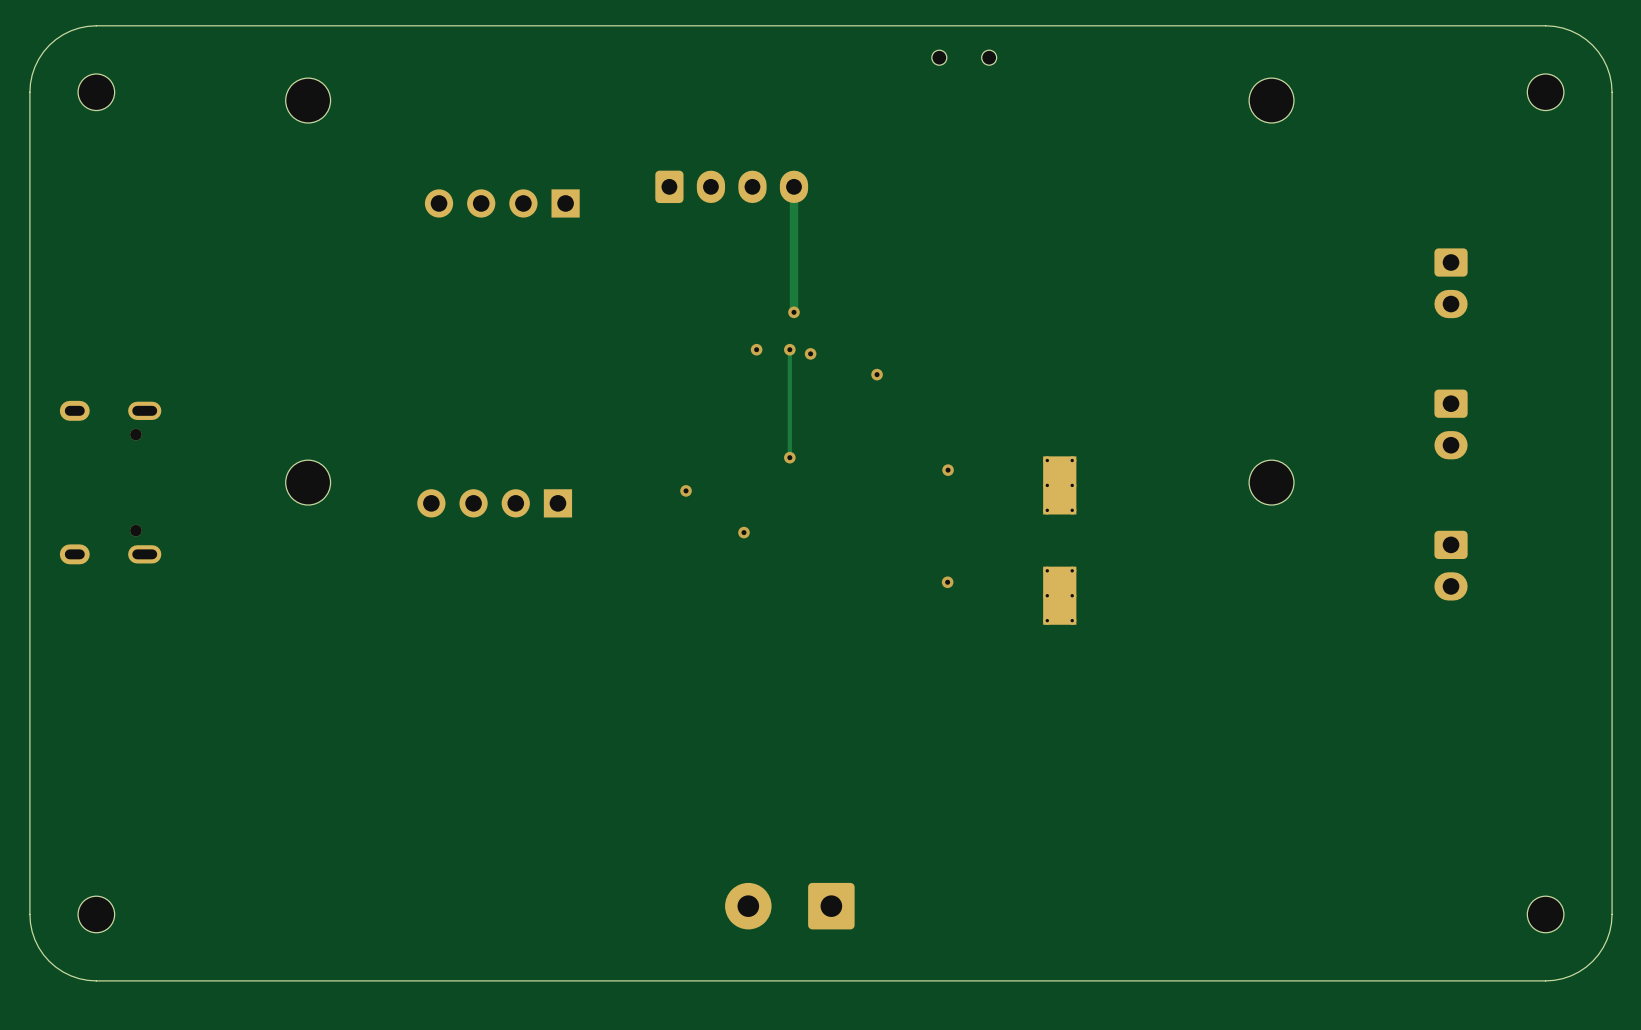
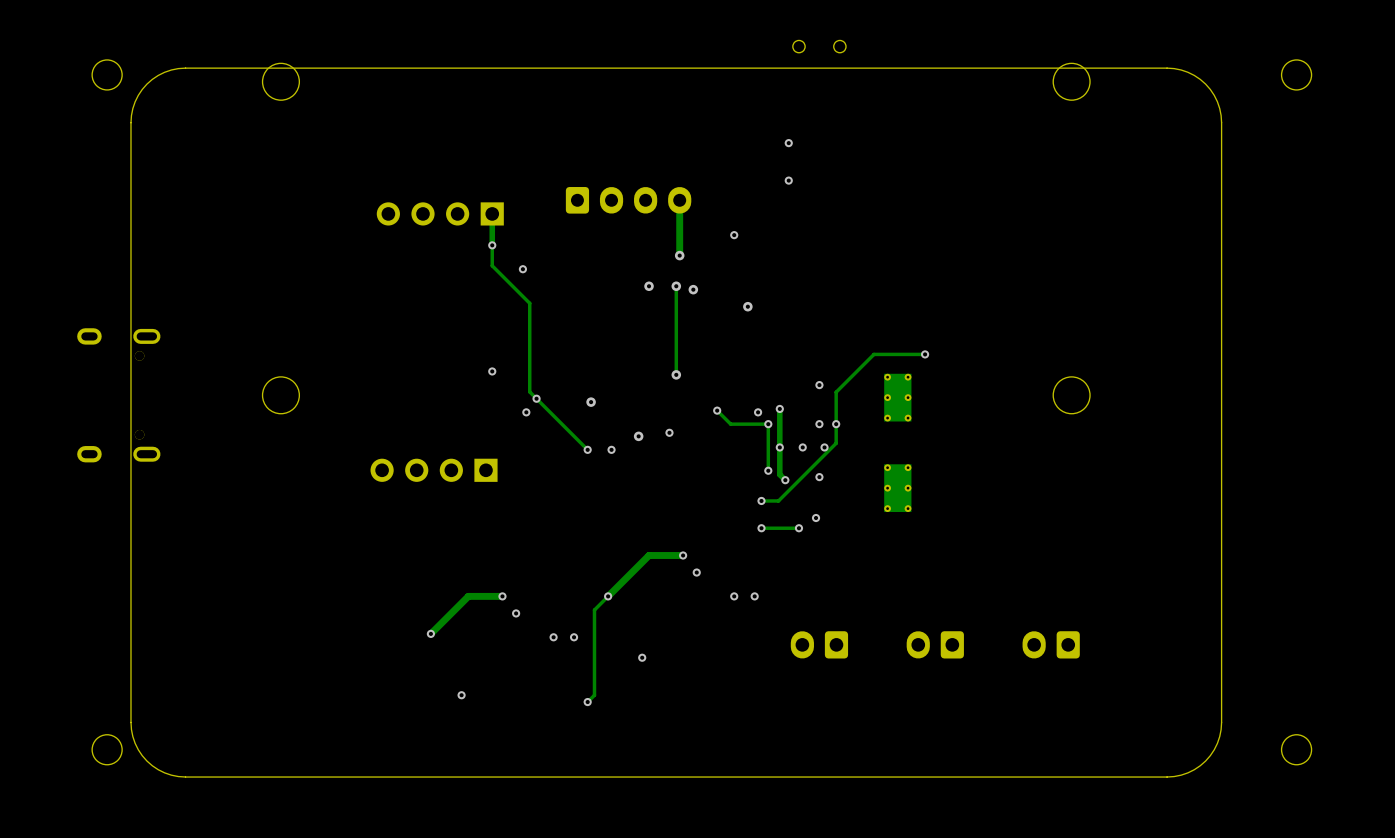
board edge: (1545, 25) (96, 25) (79, 28) (63, 34) (49, 45) (38, 59) (32, 75) (29, 92) (29, 914) (32, 931) (38, 947) (49, 961) (63, 972) (79, 978) (96, 980) (1545, 980) (1562, 978) (1578, 972) (1592, 961) (1603, 947) (1609, 931) (1612, 914) (1612, 92) (1607, 66) (1592, 45) (1571, 30) (1545, 25) -> (1167, 68) (1187, 72) (1205, 84) (1217, 101) (1221, 122) (1221, 722) (1219, 736) (1214, 749) (1205, 761) (1194, 769) (1181, 775) (1167, 777) (185, 777) (171, 775) (158, 769) (146, 761) (138, 749) (132, 736) (130, 722) (130, 122) (132, 108) (138, 95) (146, 84) (158, 75) (171, 69) (185, 68) (1167, 68)
via: none -> (788, 143)
part position: (731, 186) -> (628, 200)
track: (793, 186) (793, 244) -> none
part position: (502, 203) -> (440, 213)
via: none -> (788, 180)
track: none -> (492, 213) (492, 265) (529, 303) (529, 391) (587, 449)
part: (1451, 283) -> none
via: none -> (734, 235)
via: none -> (492, 245)
via: none -> (522, 269)
part: (1451, 424) -> none
track: none -> (925, 354) (873, 354) (836, 392) (836, 443) (778, 500) (761, 500)
via: none -> (925, 354)
via: none -> (492, 371)
via: (948, 470) -> none
via: none -> (819, 385)
via: none -> (536, 398)
track: none -> (779, 408) (779, 474) (785, 480)
via: none -> (779, 408)
track: none -> (717, 410) (730, 424) (768, 424) (768, 470)
via: none -> (717, 410)
part position: (494, 503) -> (434, 470)
via: none -> (526, 412)
via: none -> (758, 412)
via: none -> (768, 424)
via: none -> (819, 424)
via: none -> (836, 424)
via: none -> (669, 432)
via: none -> (779, 447)
via: none -> (802, 447)
via: none -> (824, 447)
via: none -> (587, 449)
via: none -> (611, 449)
part: (1451, 565) -> none
via: none -> (768, 470)
via: (947, 582) -> none
via: none -> (819, 477)
via: none -> (785, 480)
via: none -> (761, 500)
via: none -> (816, 518)
via: none -> (761, 528)
track: none -> (798, 528) (761, 528)
via: none -> (798, 528)
track: none -> (683, 555) (649, 555) (594, 610) (594, 695) (587, 702)
via: none -> (683, 555)
via: none -> (696, 572)
track: none -> (502, 596) (468, 596) (430, 633)
via: none -> (502, 596)
via: none -> (608, 596)
via: none -> (734, 596)
via: none -> (754, 596)
via: none -> (516, 613)
via: none -> (430, 633)
via: none -> (553, 637)
via: none -> (574, 637)
part: none -> (819, 644)
part: none -> (935, 644)
part: none -> (1051, 644)
via: none -> (642, 657)
via: none -> (461, 695)
via: none -> (587, 702)
part: (789, 906) -> none

